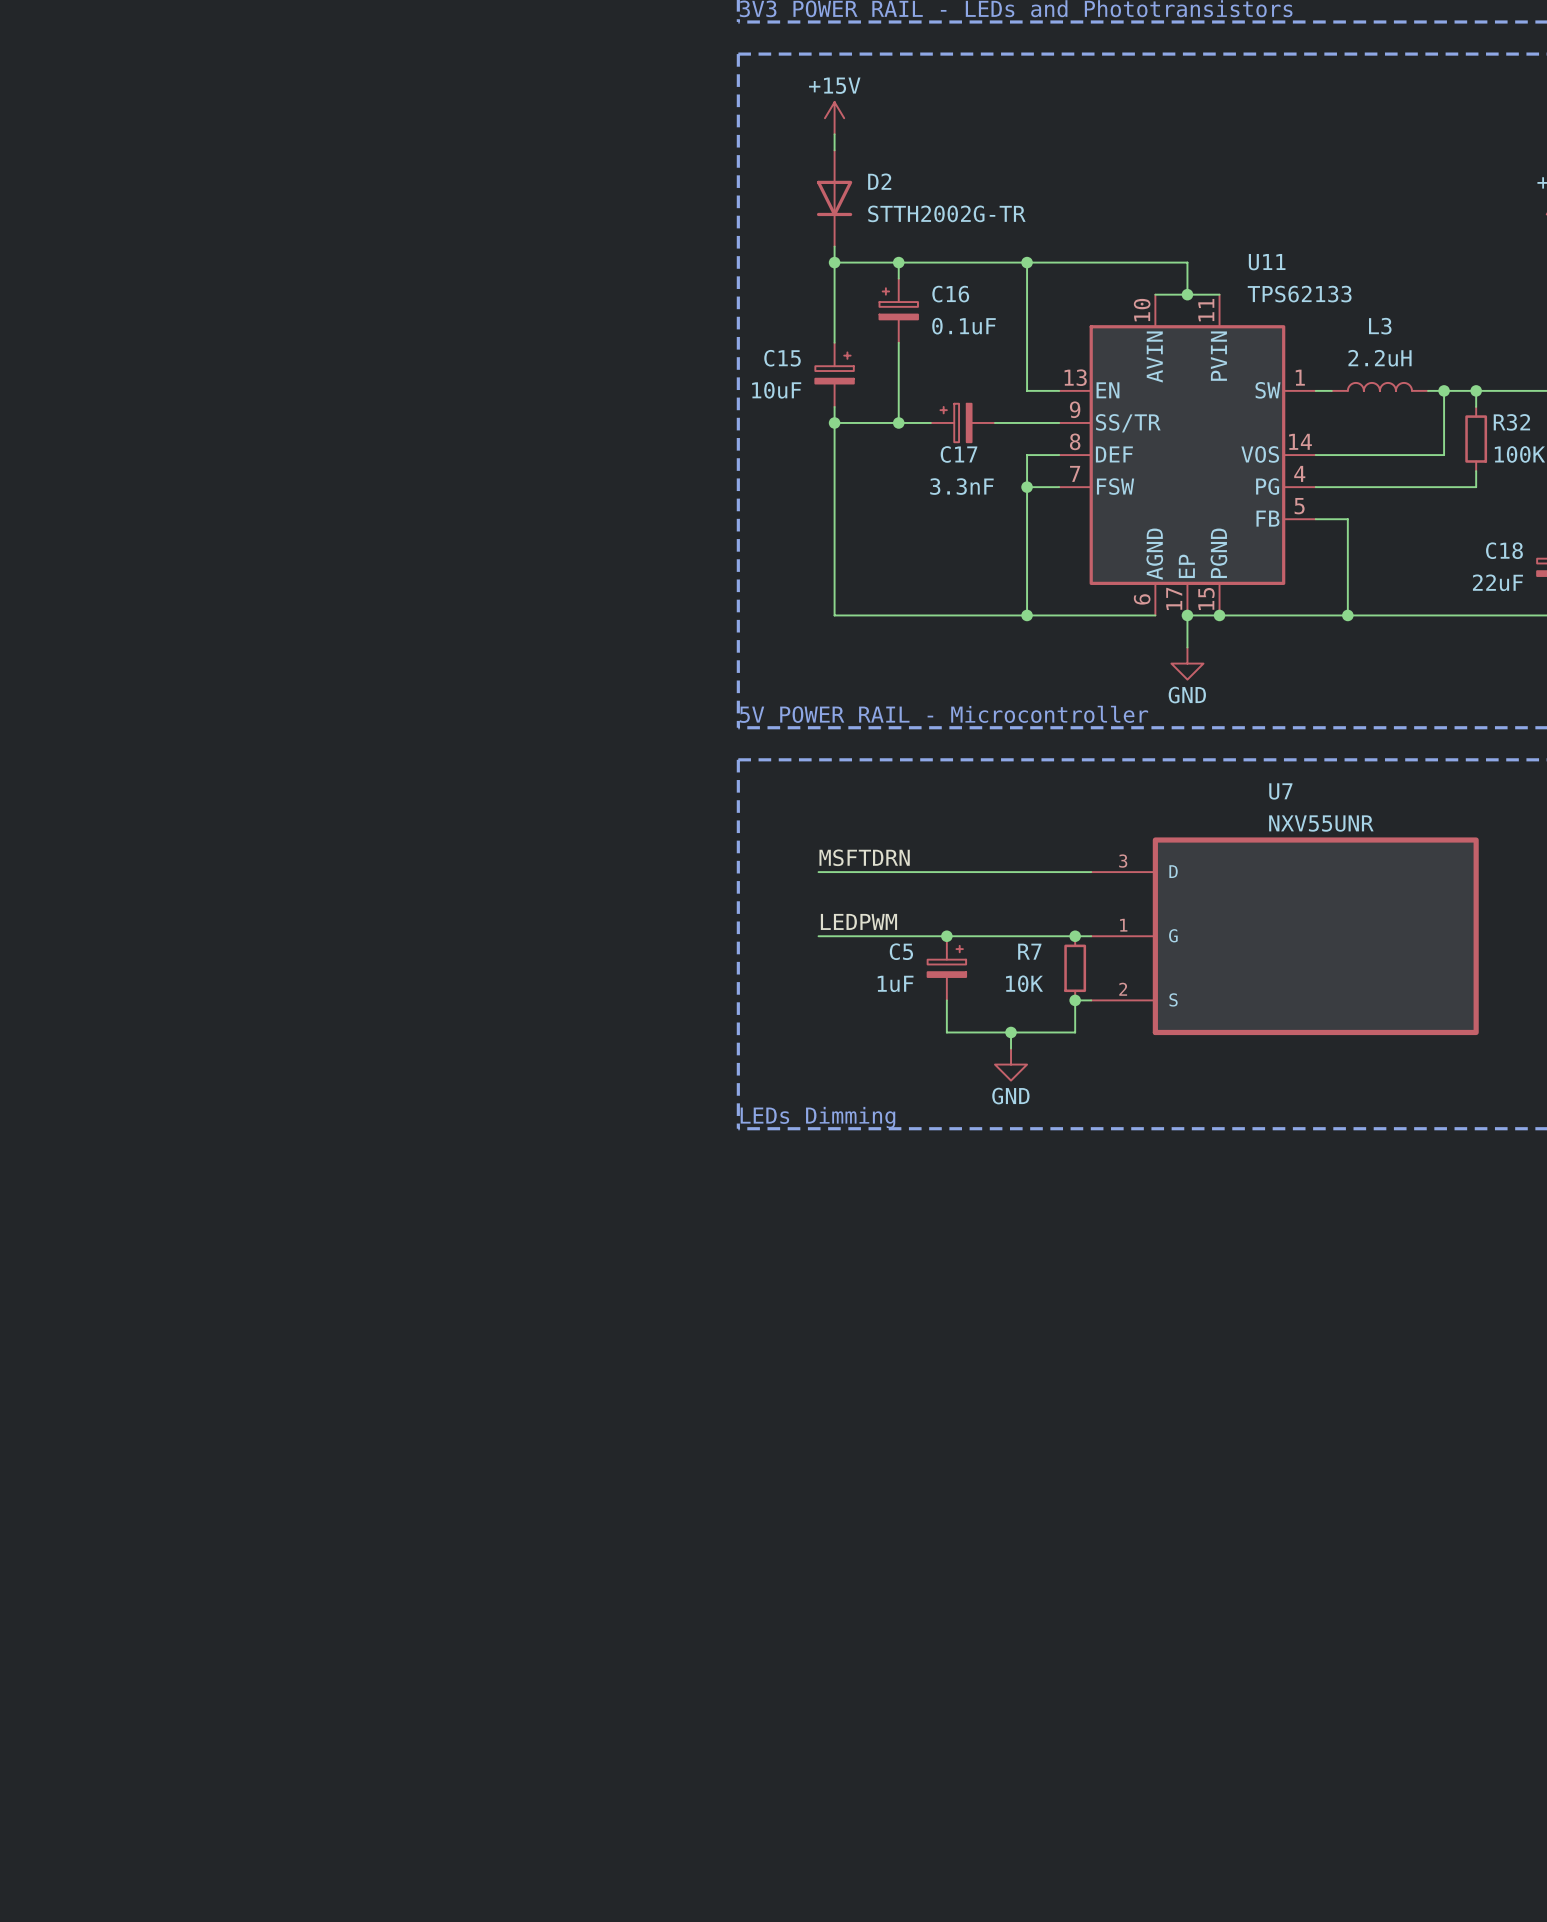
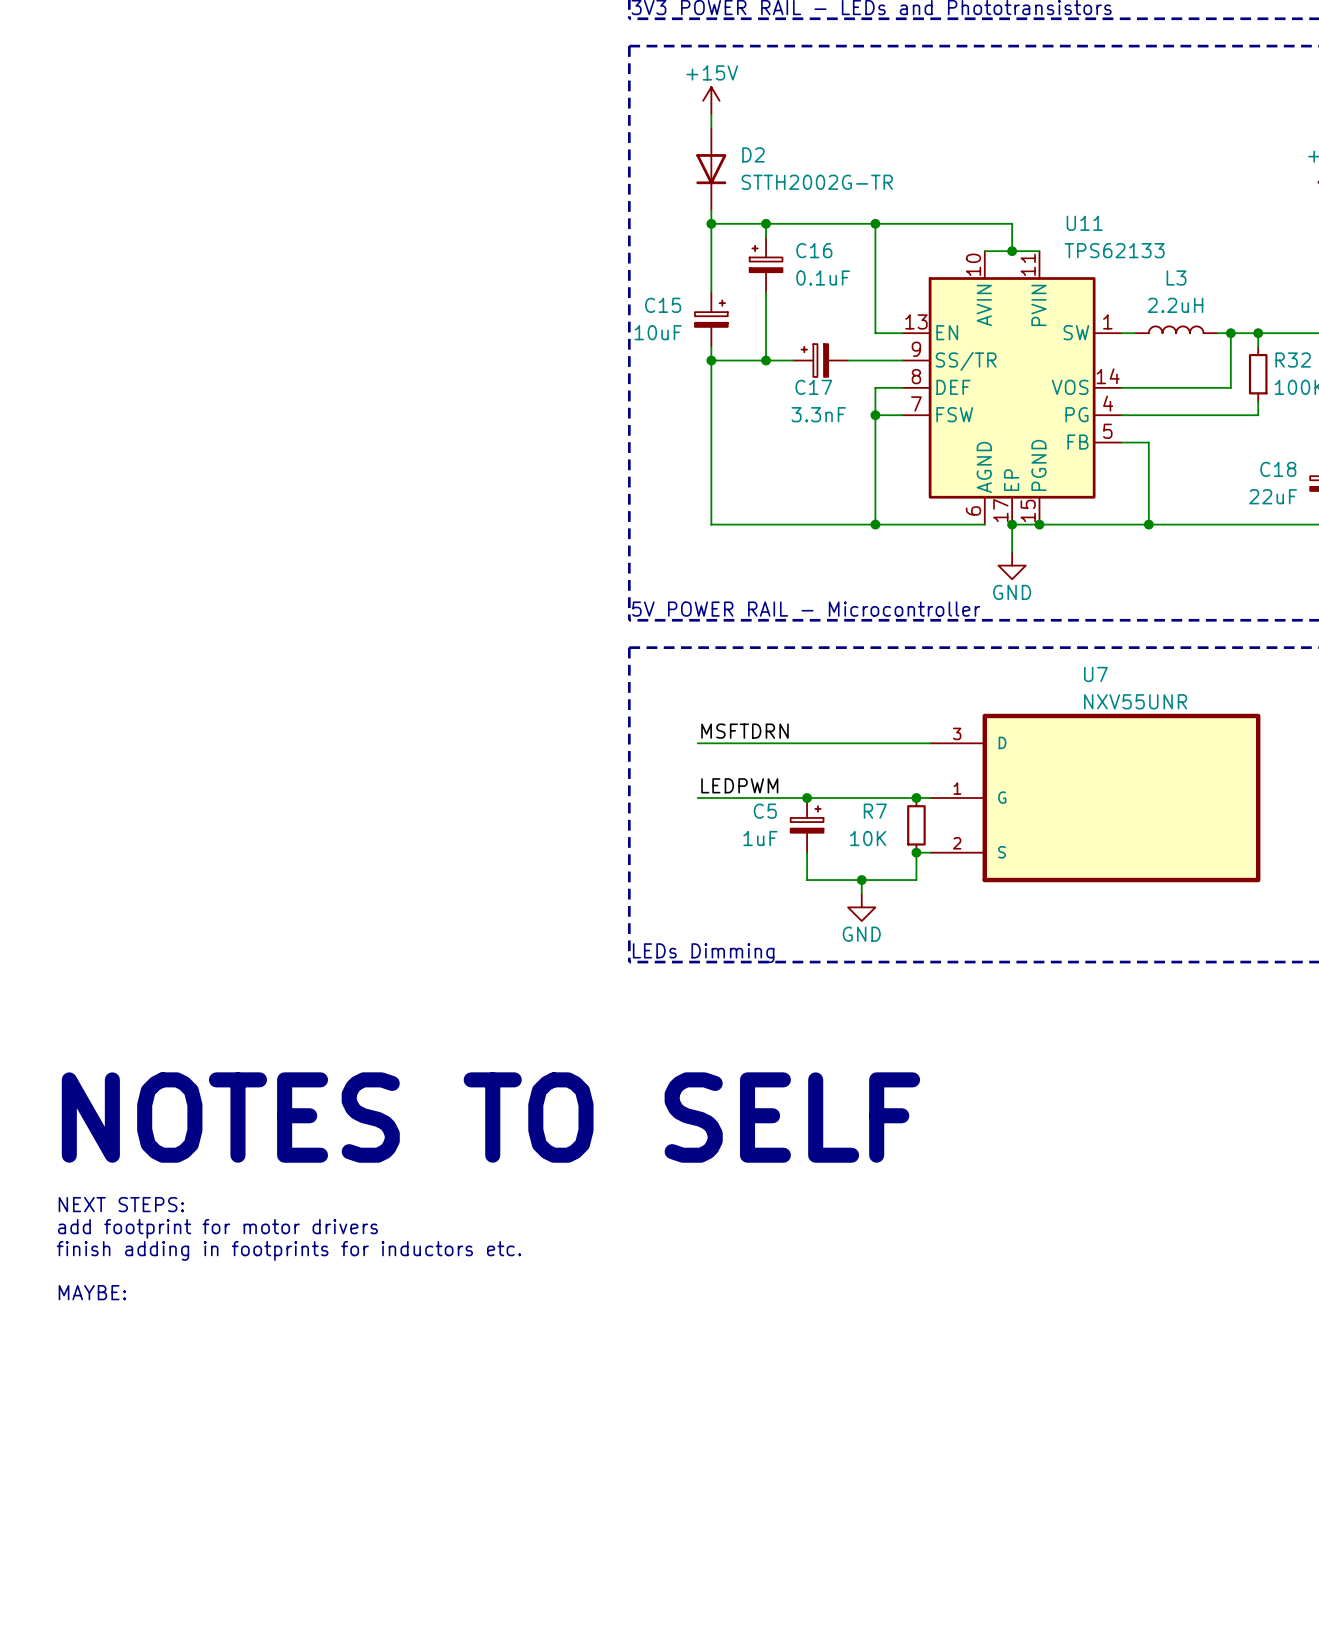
text: none -> NOTES TO SELF (490, 1117)
text: none -> NEXT STEPS: (121, 1204)
text: none -> add footprint for motor drivers (217, 1228)
text: none -> finish adding in footprints for inductors etc. (288, 1250)
text: none -> MAYBE: (92, 1292)

